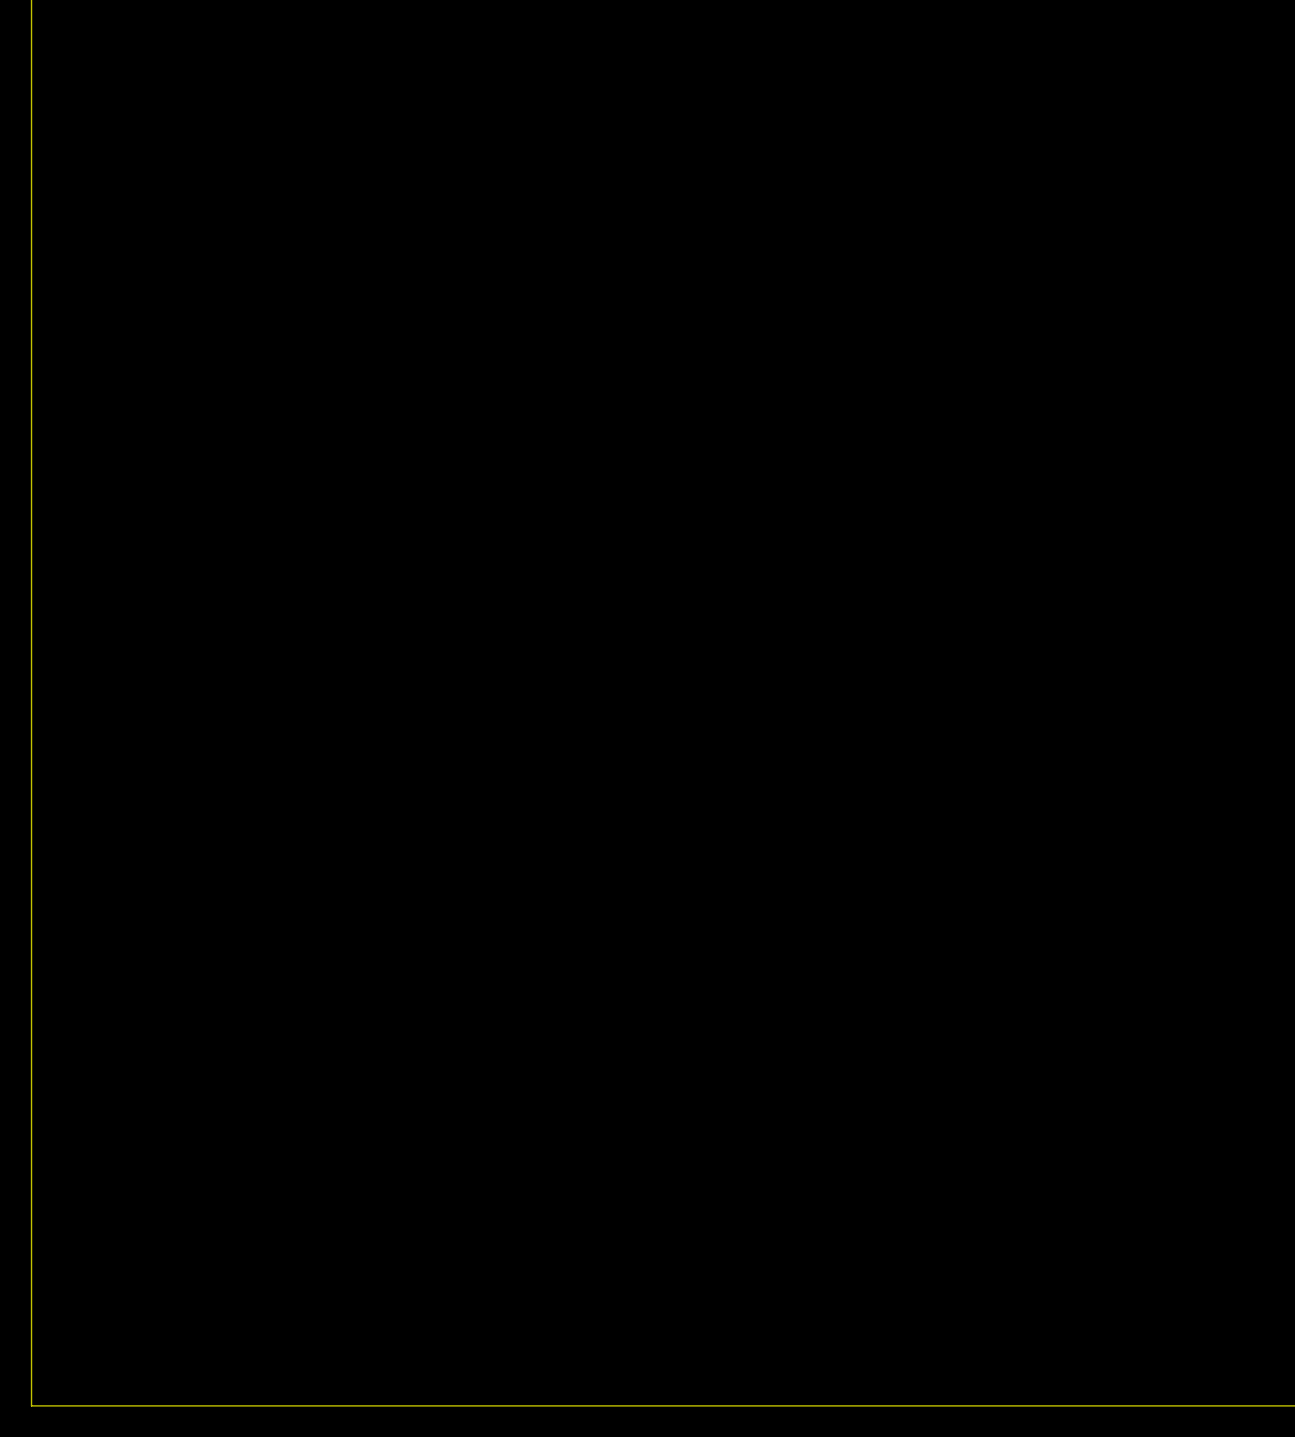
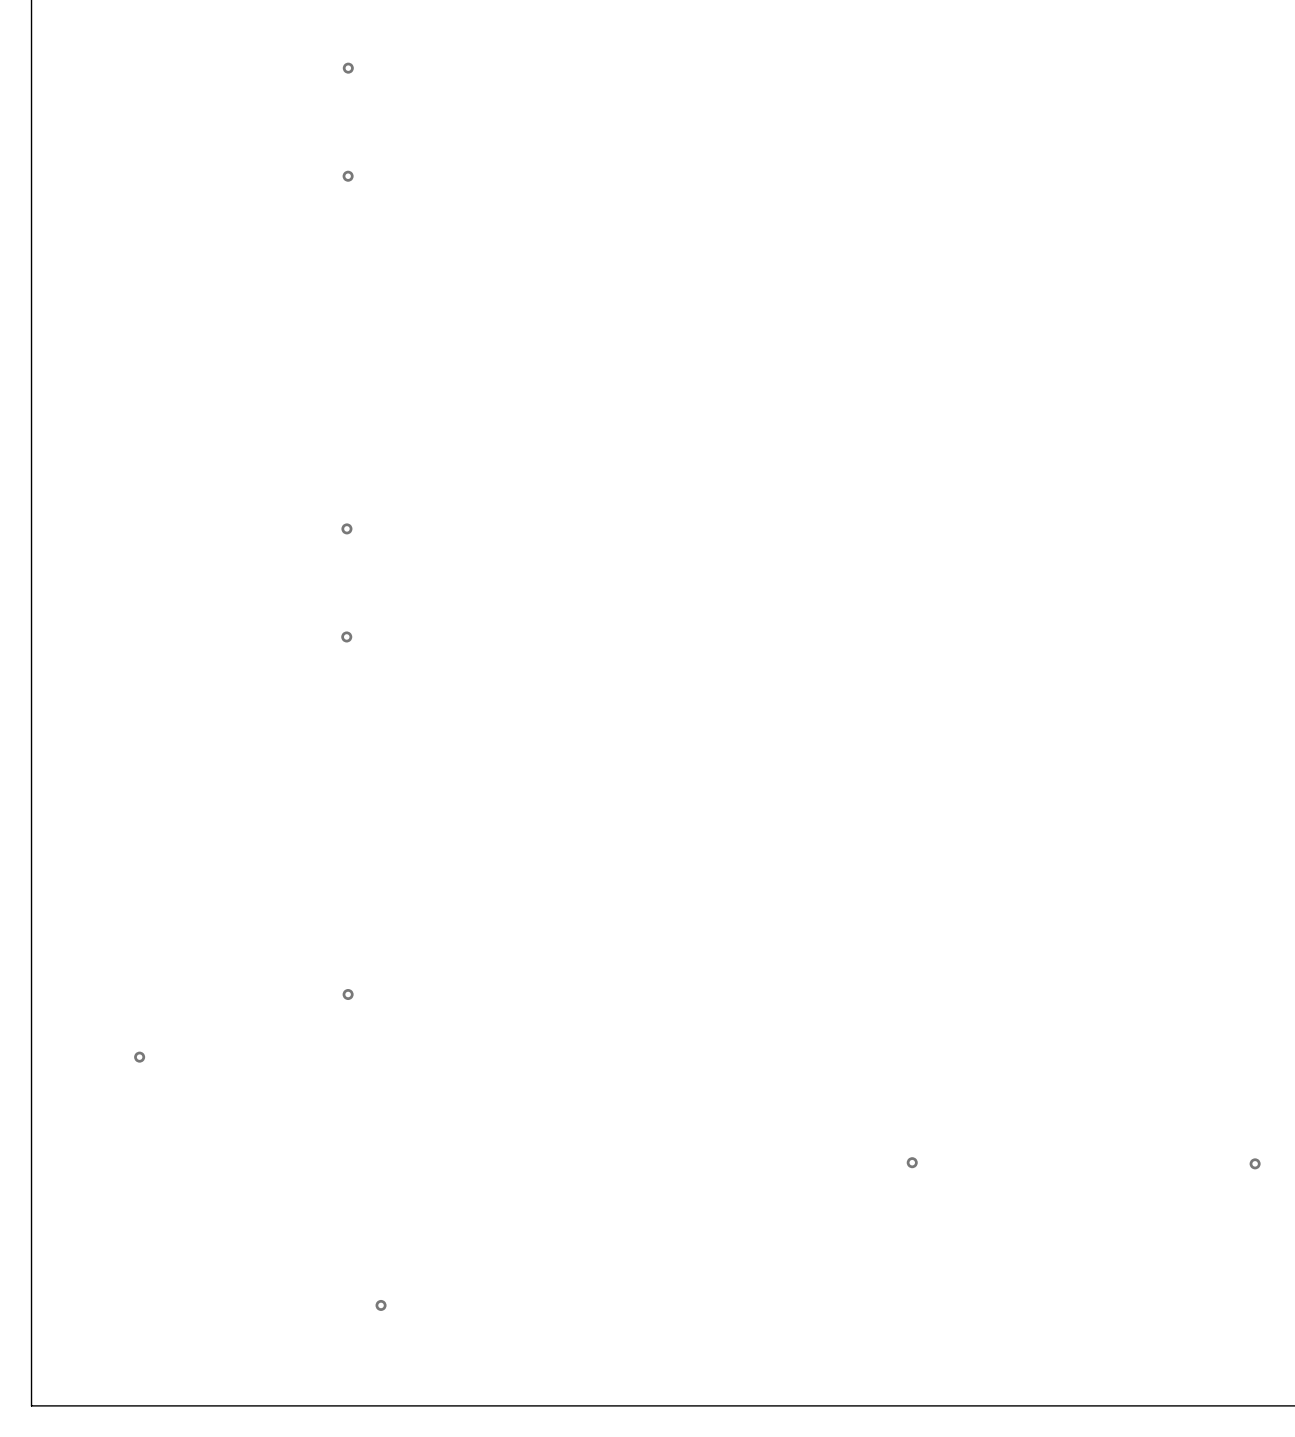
via: none -> (348, 68)
via: none -> (348, 176)
via: none -> (346, 528)
via: none -> (346, 636)
via: none -> (348, 994)
via: none -> (139, 1057)
via: none -> (912, 1162)
via: none -> (1255, 1163)
via: none -> (381, 1305)

